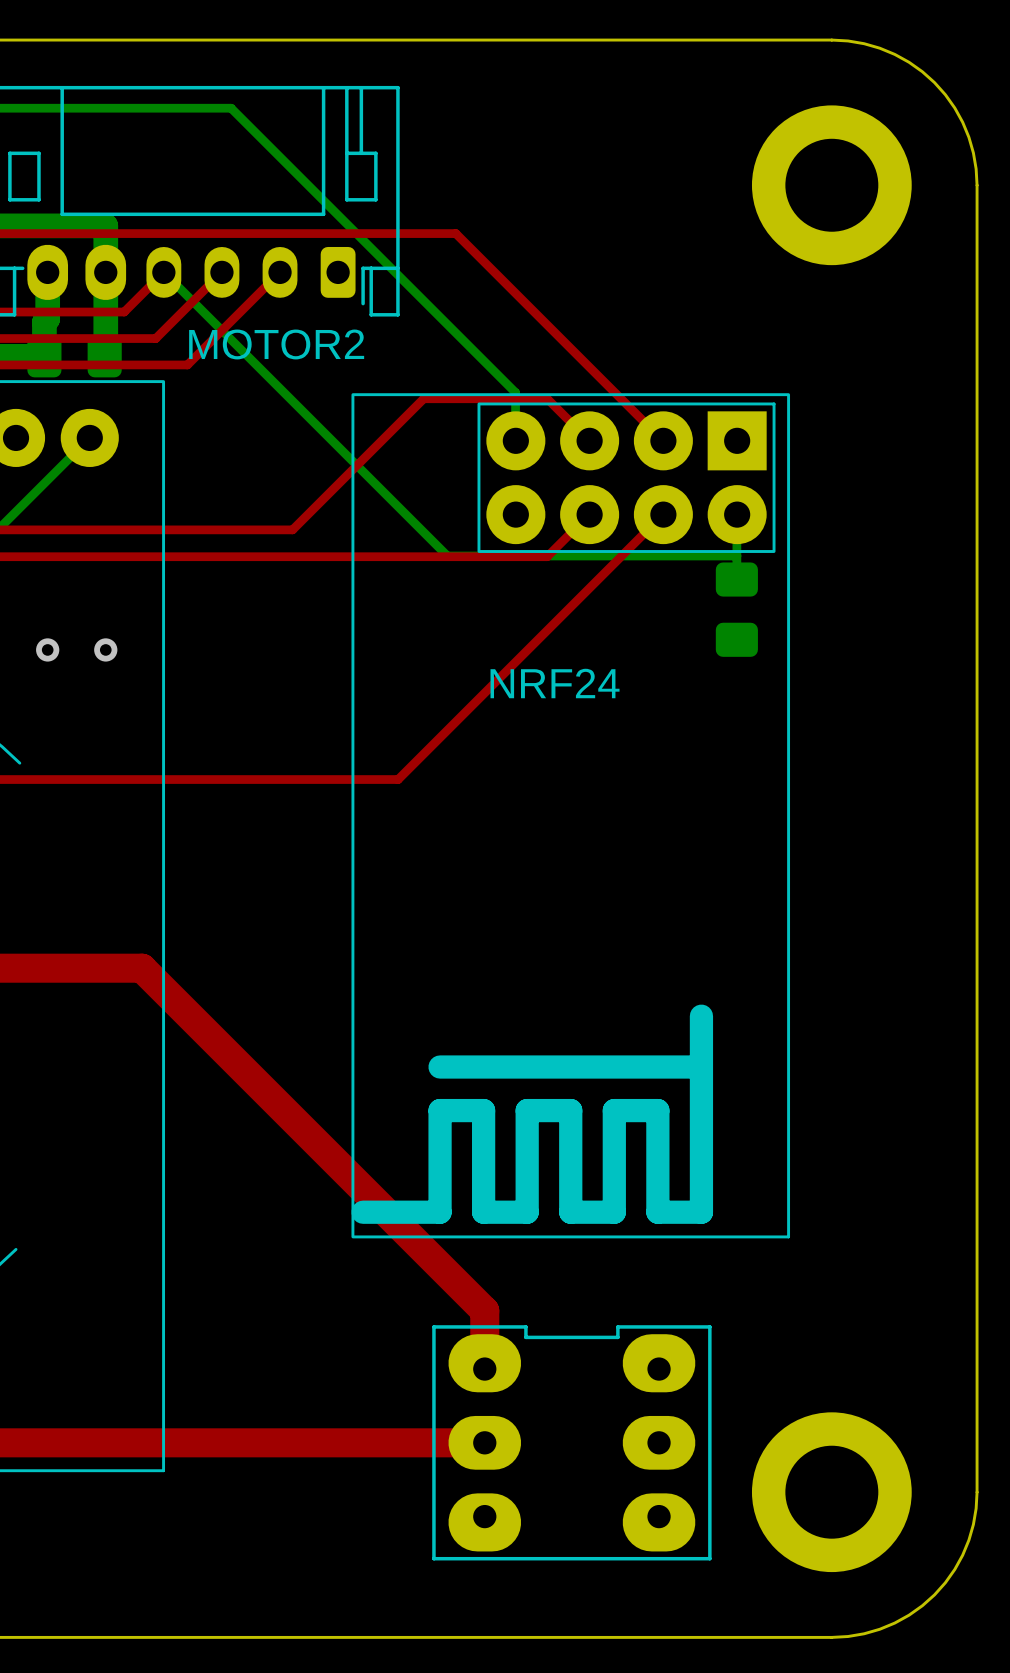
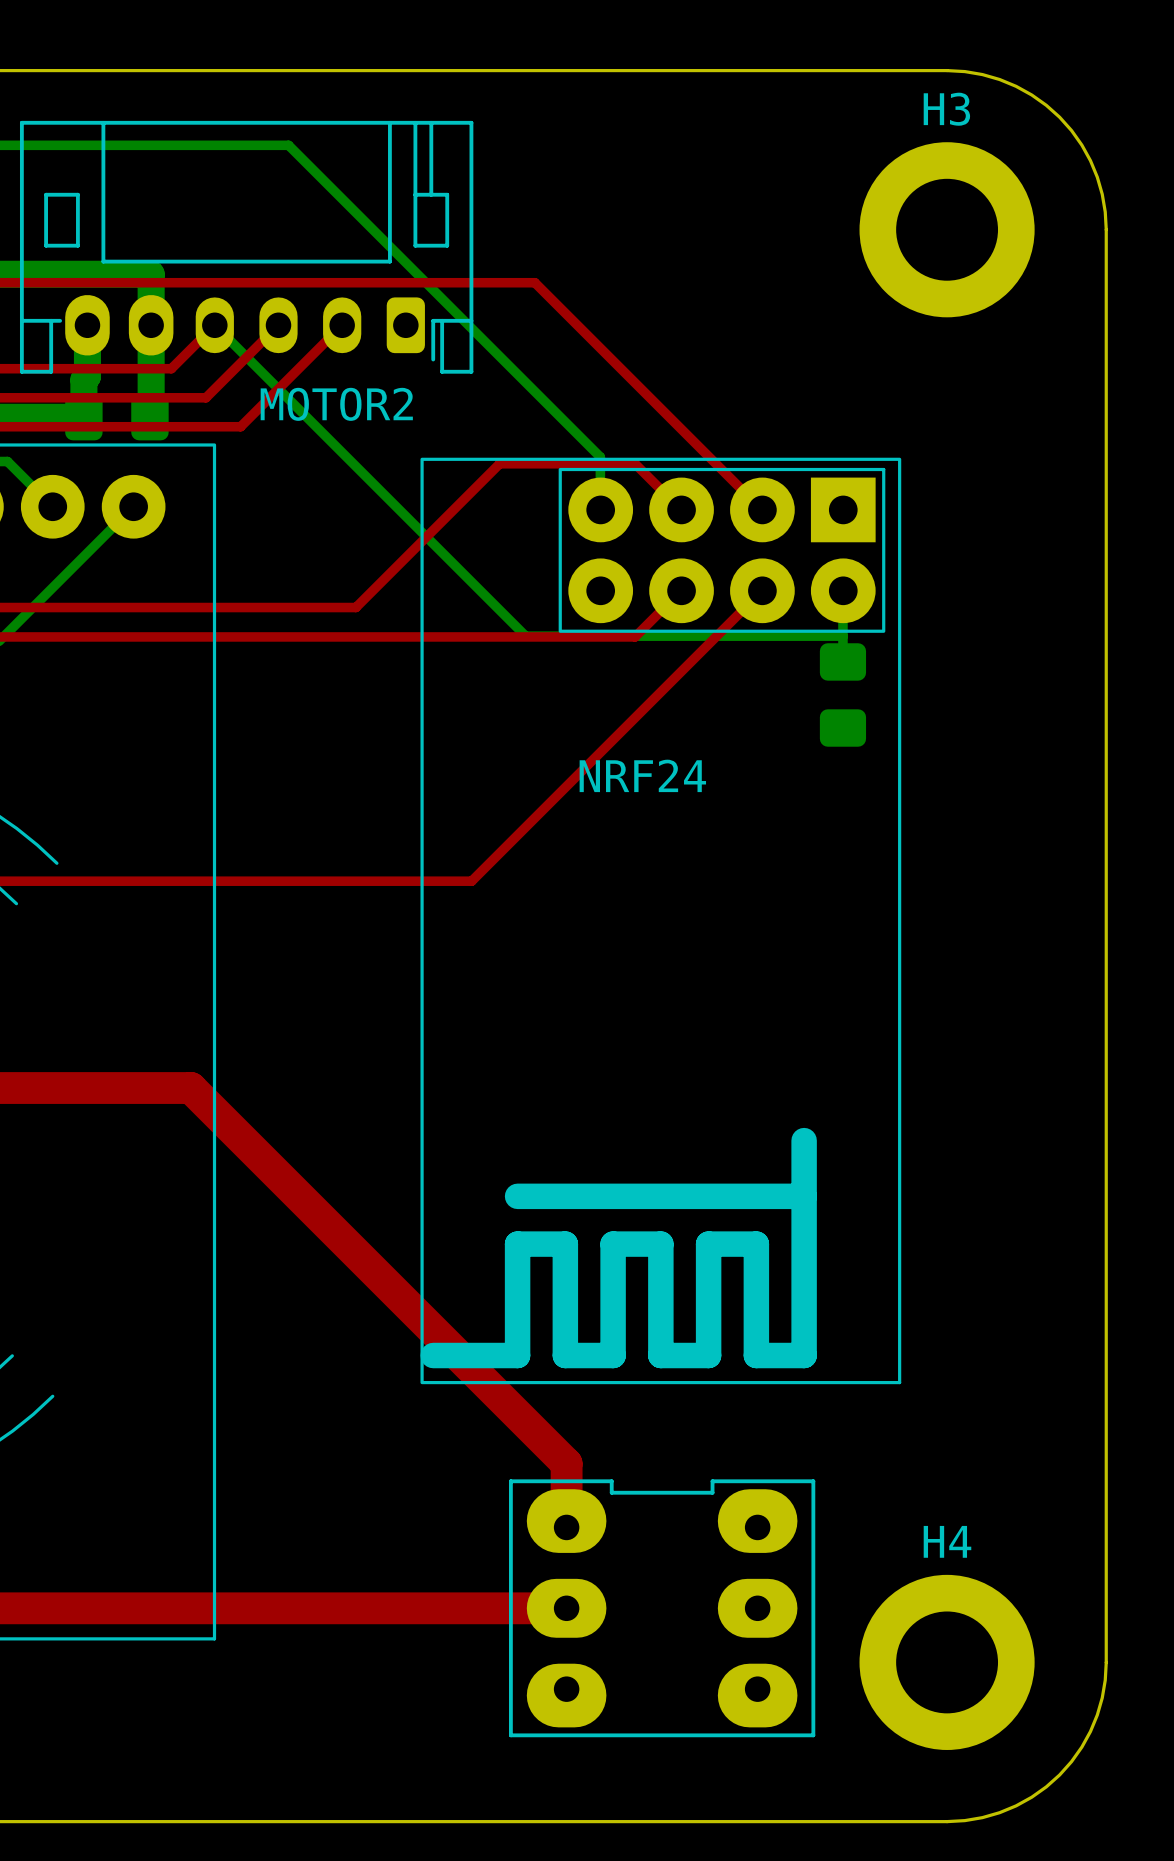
H3 name: none -> H3 (946, 109)
via: (47, 649) -> none
via: (105, 649) -> none
H4 name: none -> H4 (947, 1541)

